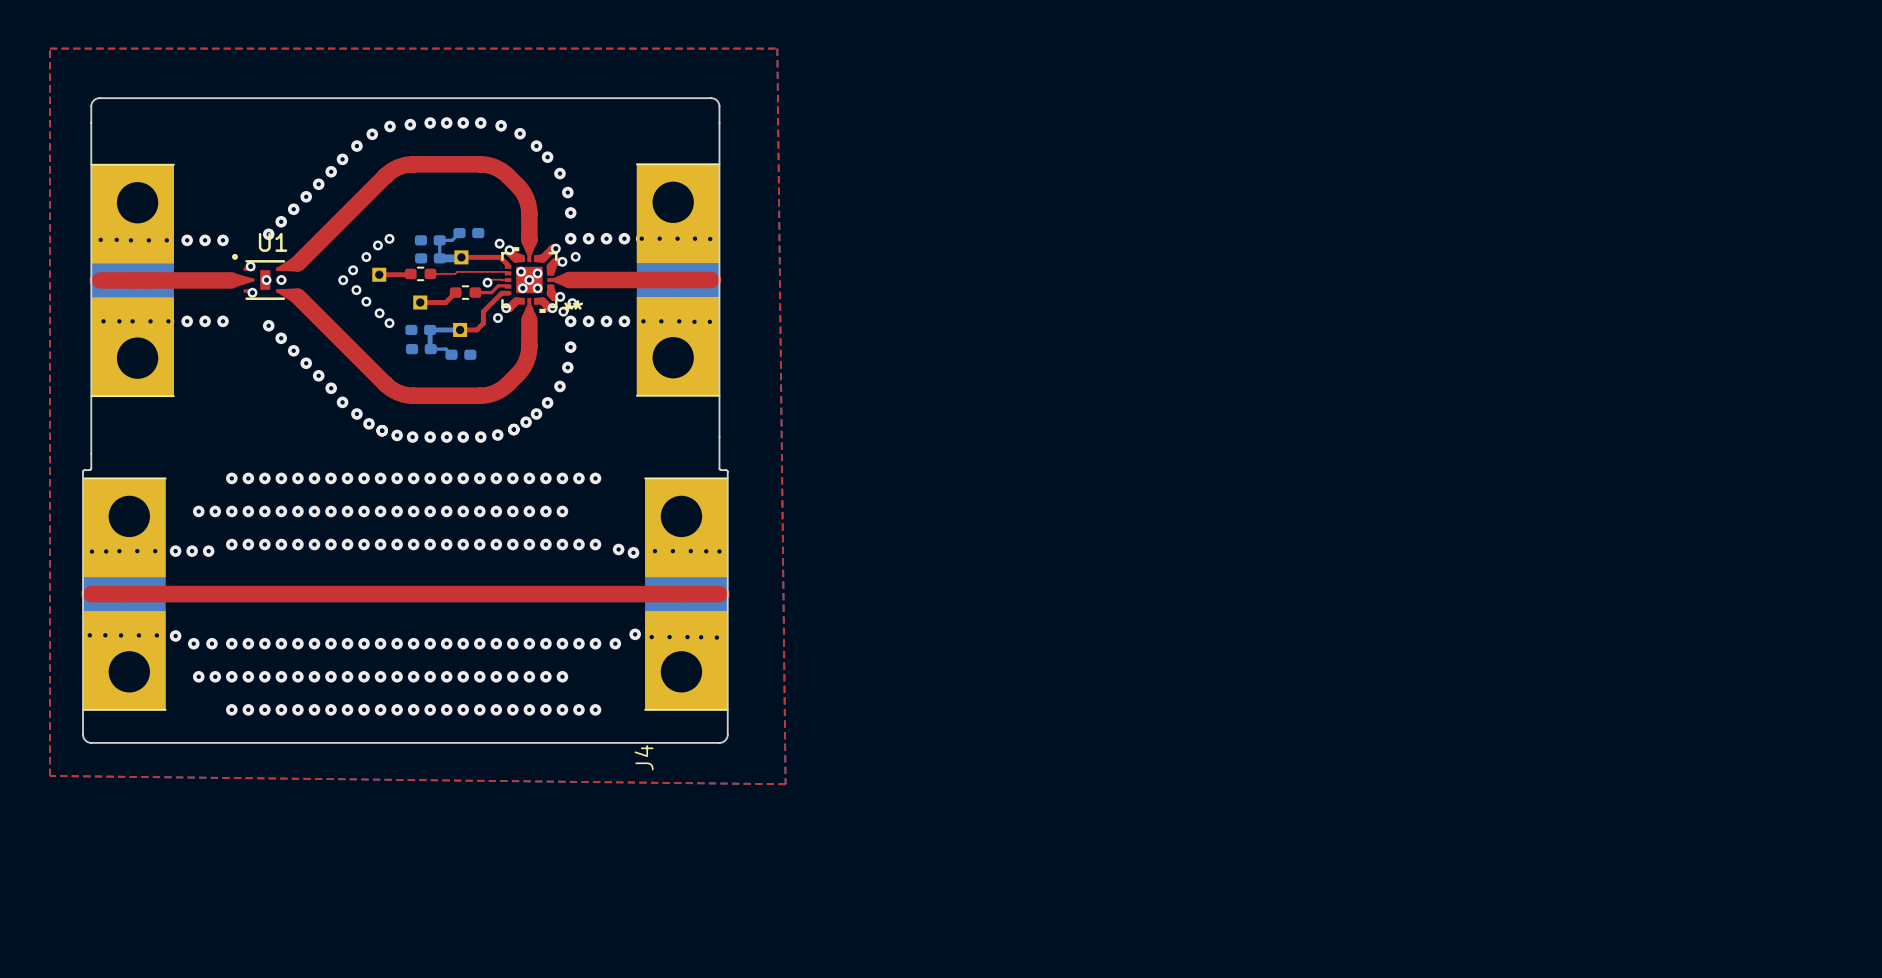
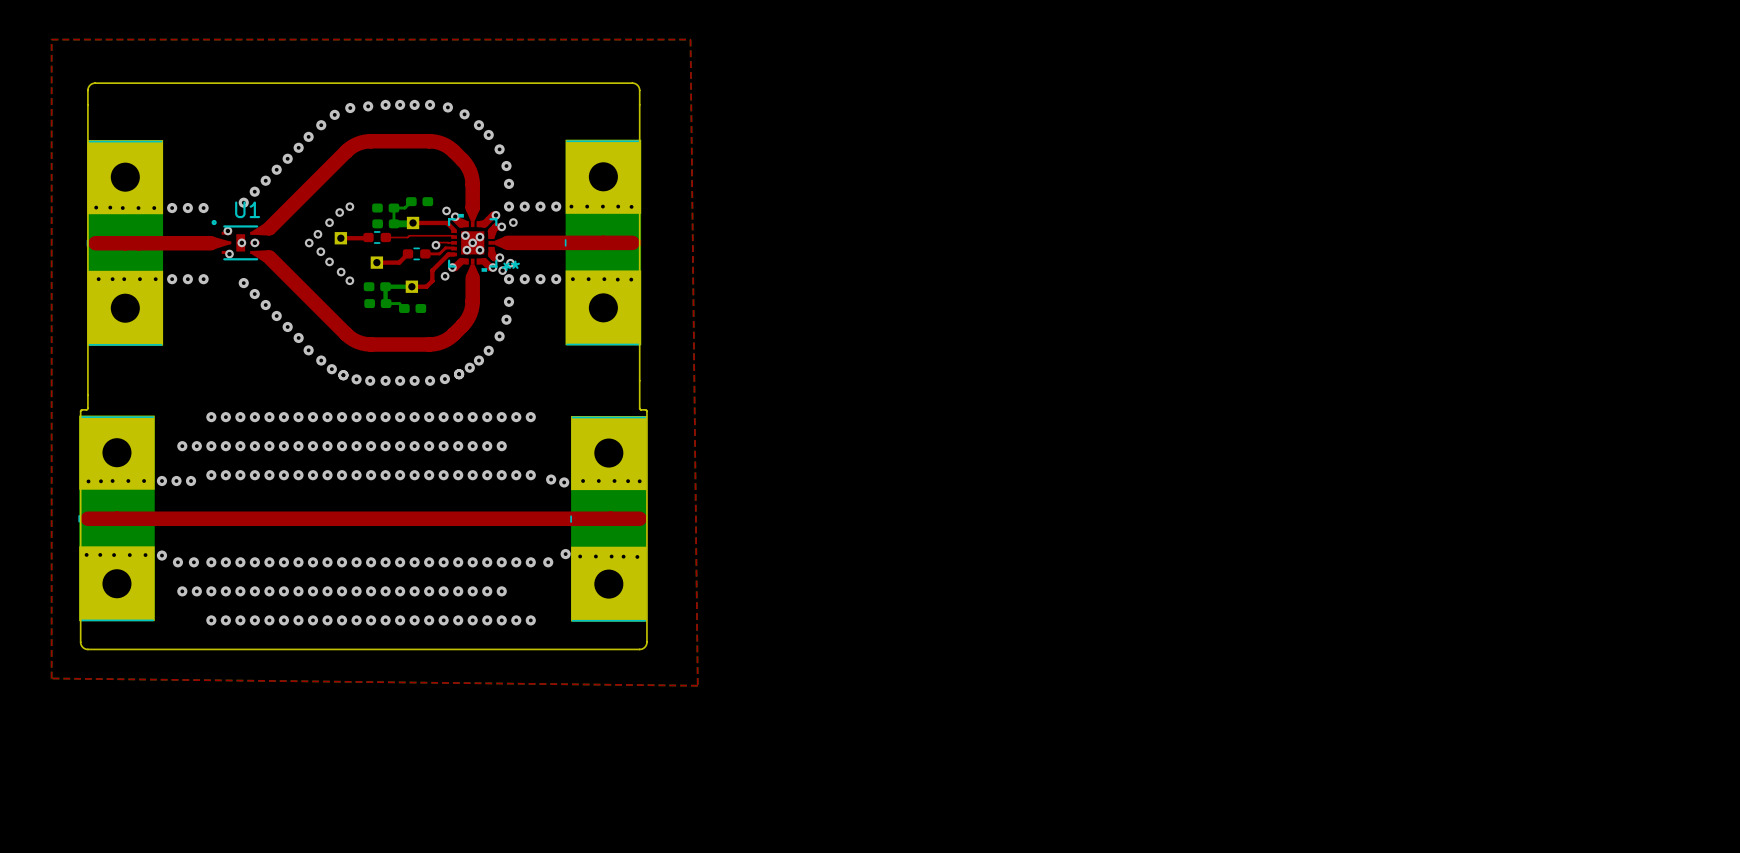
part footprint: [89, 163, 176, 397] -> [86, 140, 164, 346]
part footprint: [635, 163, 722, 397] -> [564, 139, 642, 346]
part footprint: [81, 477, 168, 711] -> [78, 415, 155, 622]
part: none -> (608, 518)
J4: (686, 594) -> none

